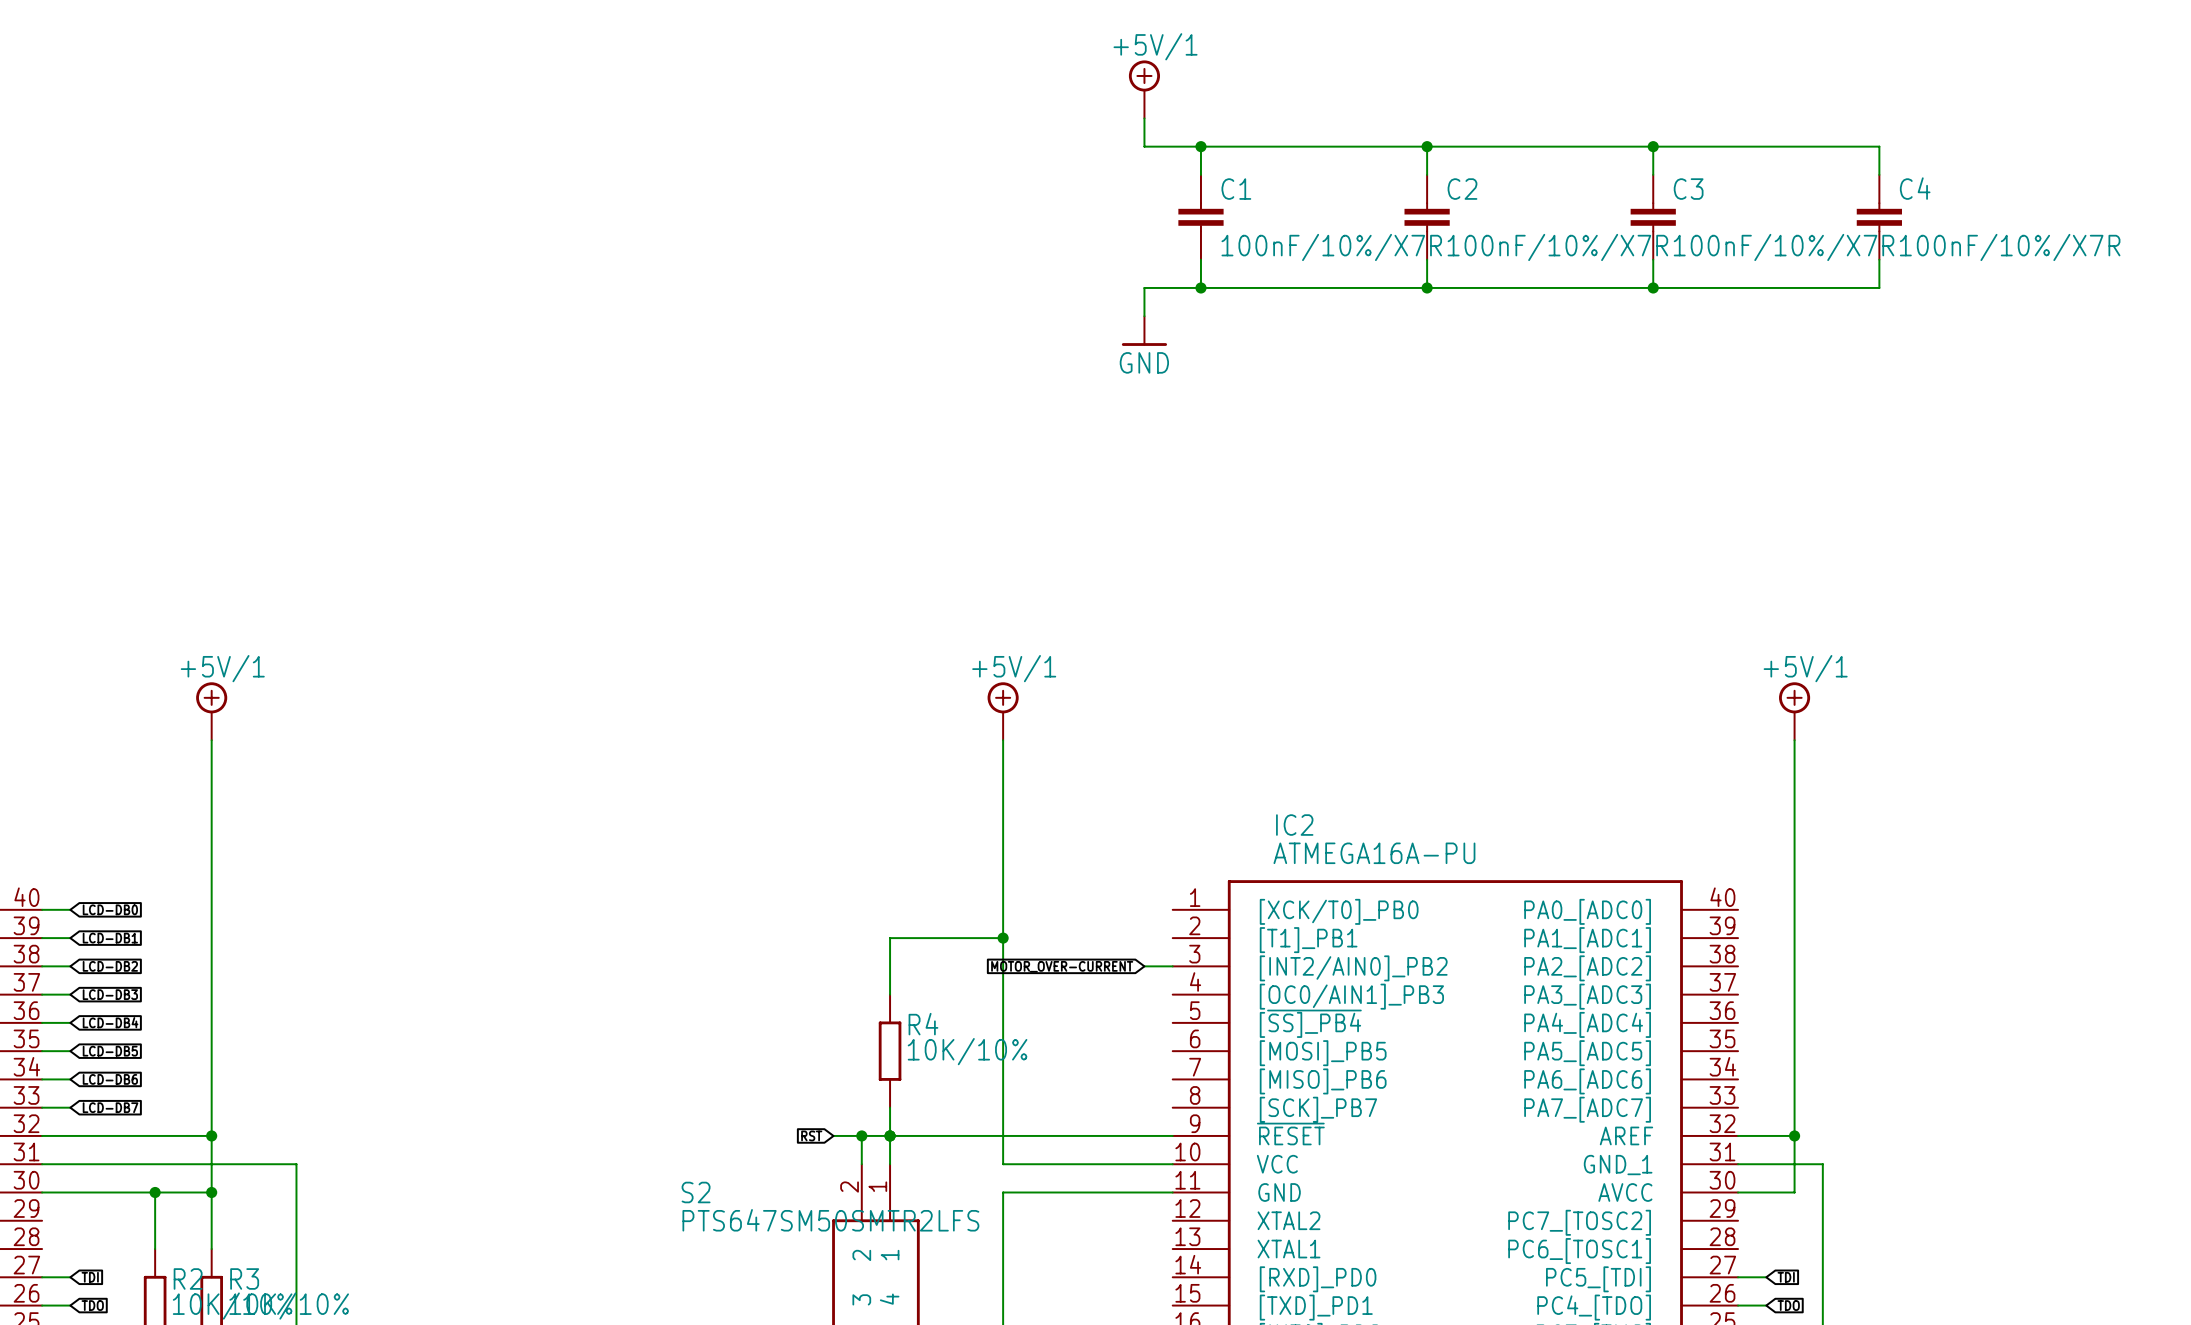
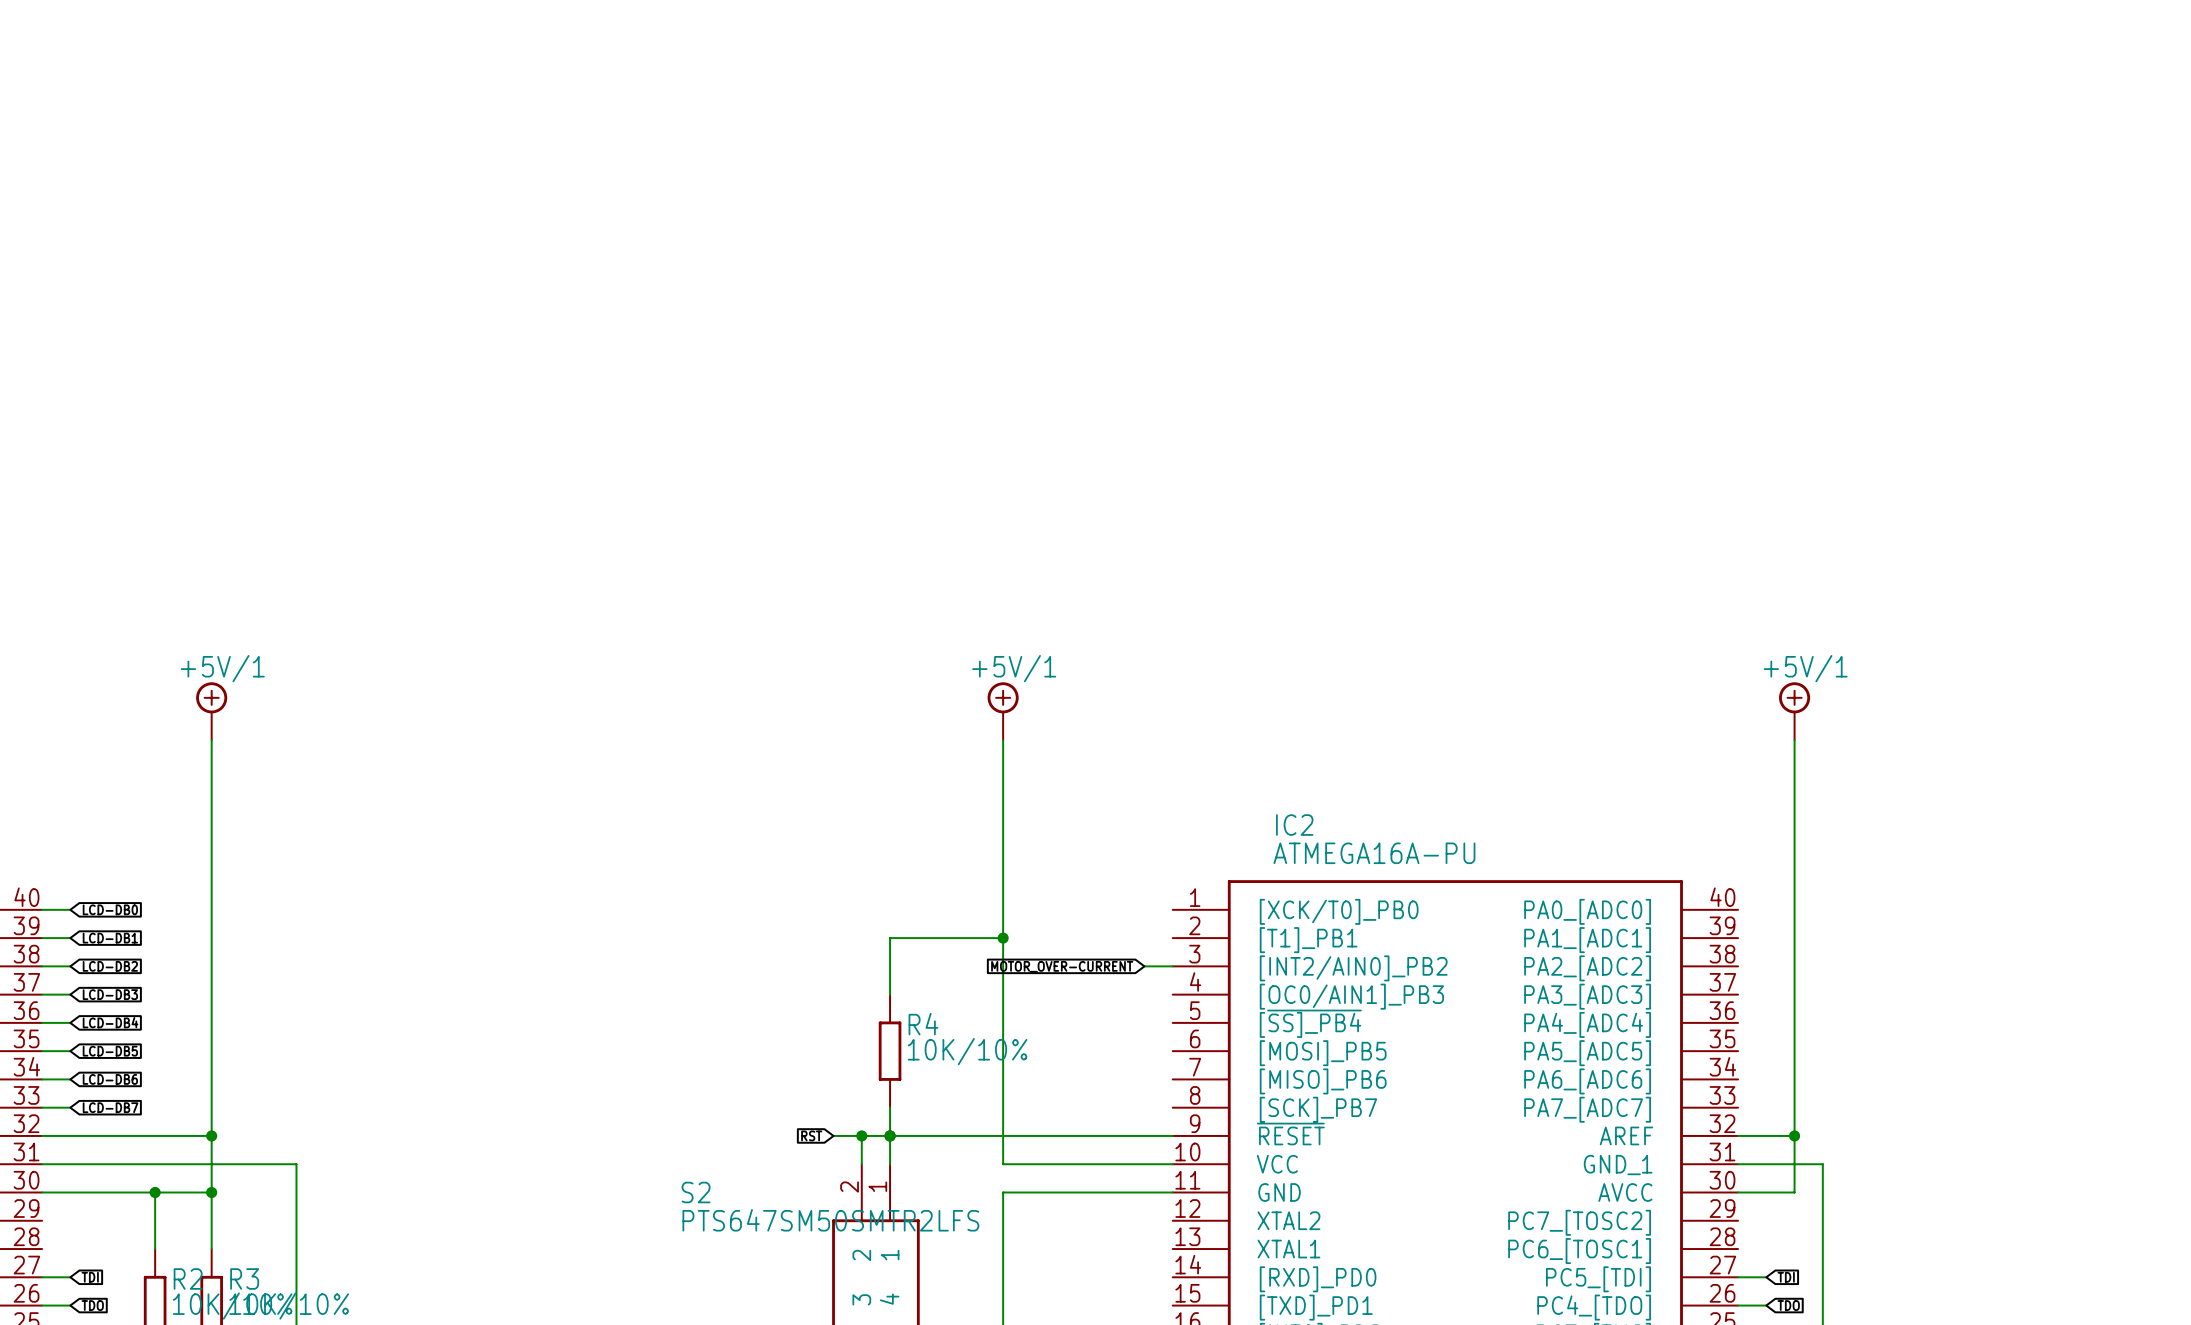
power symbol: +5V/1 (1144, 89) -> none
wire: (1144, 118) (1144, 146) (1879, 146) (1879, 174) -> none
wire: (1200, 146) (1200, 174) -> none
junction: (1200, 146) -> none
wire: (1427, 146) (1427, 174) -> none
junction: (1427, 146) -> none
wire: (1653, 146) (1653, 174) -> none
junction: (1653, 146) -> none
C1: 100nF/10%/X7R (1200, 217) -> none
C2: 100nF/10%/X7R (1427, 217) -> none
C3: 100nF/10%/X7R (1653, 217) -> none
C4: 100nF/10%/X7R (1879, 217) -> none
wire: (1200, 259) (1200, 287) -> none
wire: (1427, 259) (1427, 287) -> none
wire: (1653, 259) (1653, 287) -> none
wire: (1879, 259) (1879, 287) (1144, 287) (1144, 316) -> none
junction: (1200, 287) -> none
junction: (1427, 287) -> none
junction: (1653, 287) -> none
power symbol: GND (1144, 331) -> none

